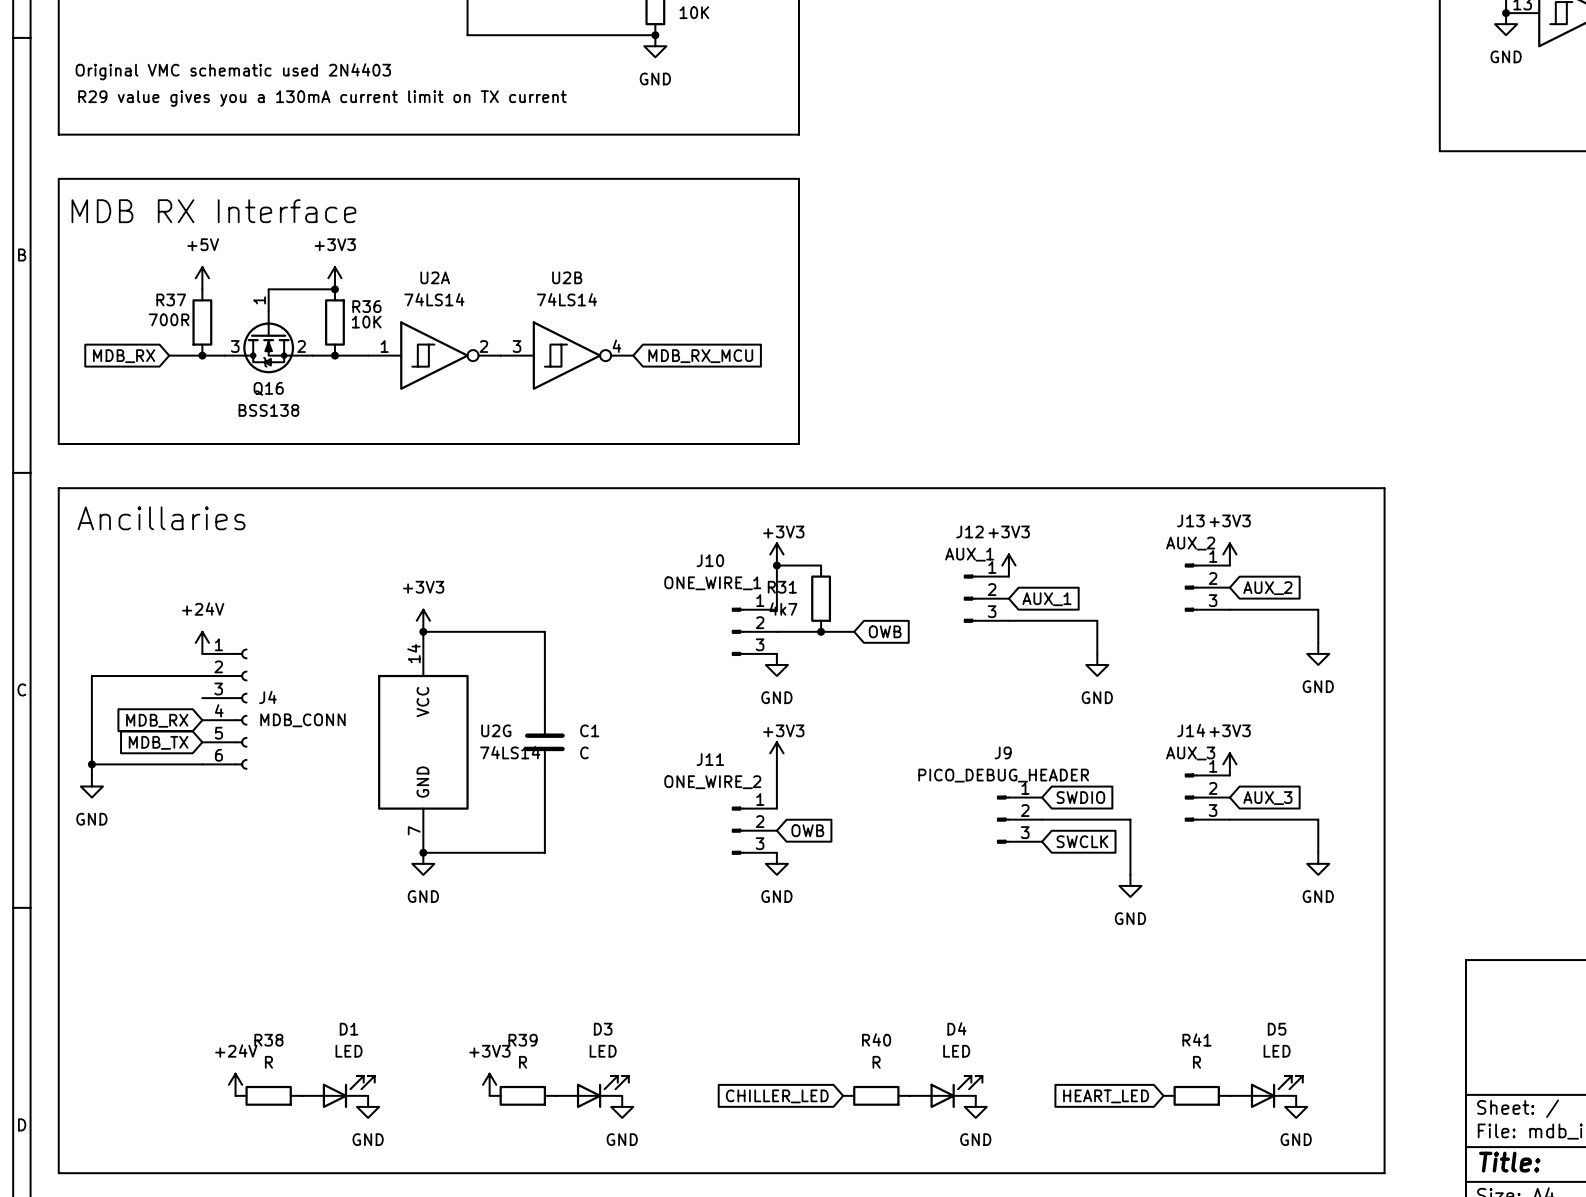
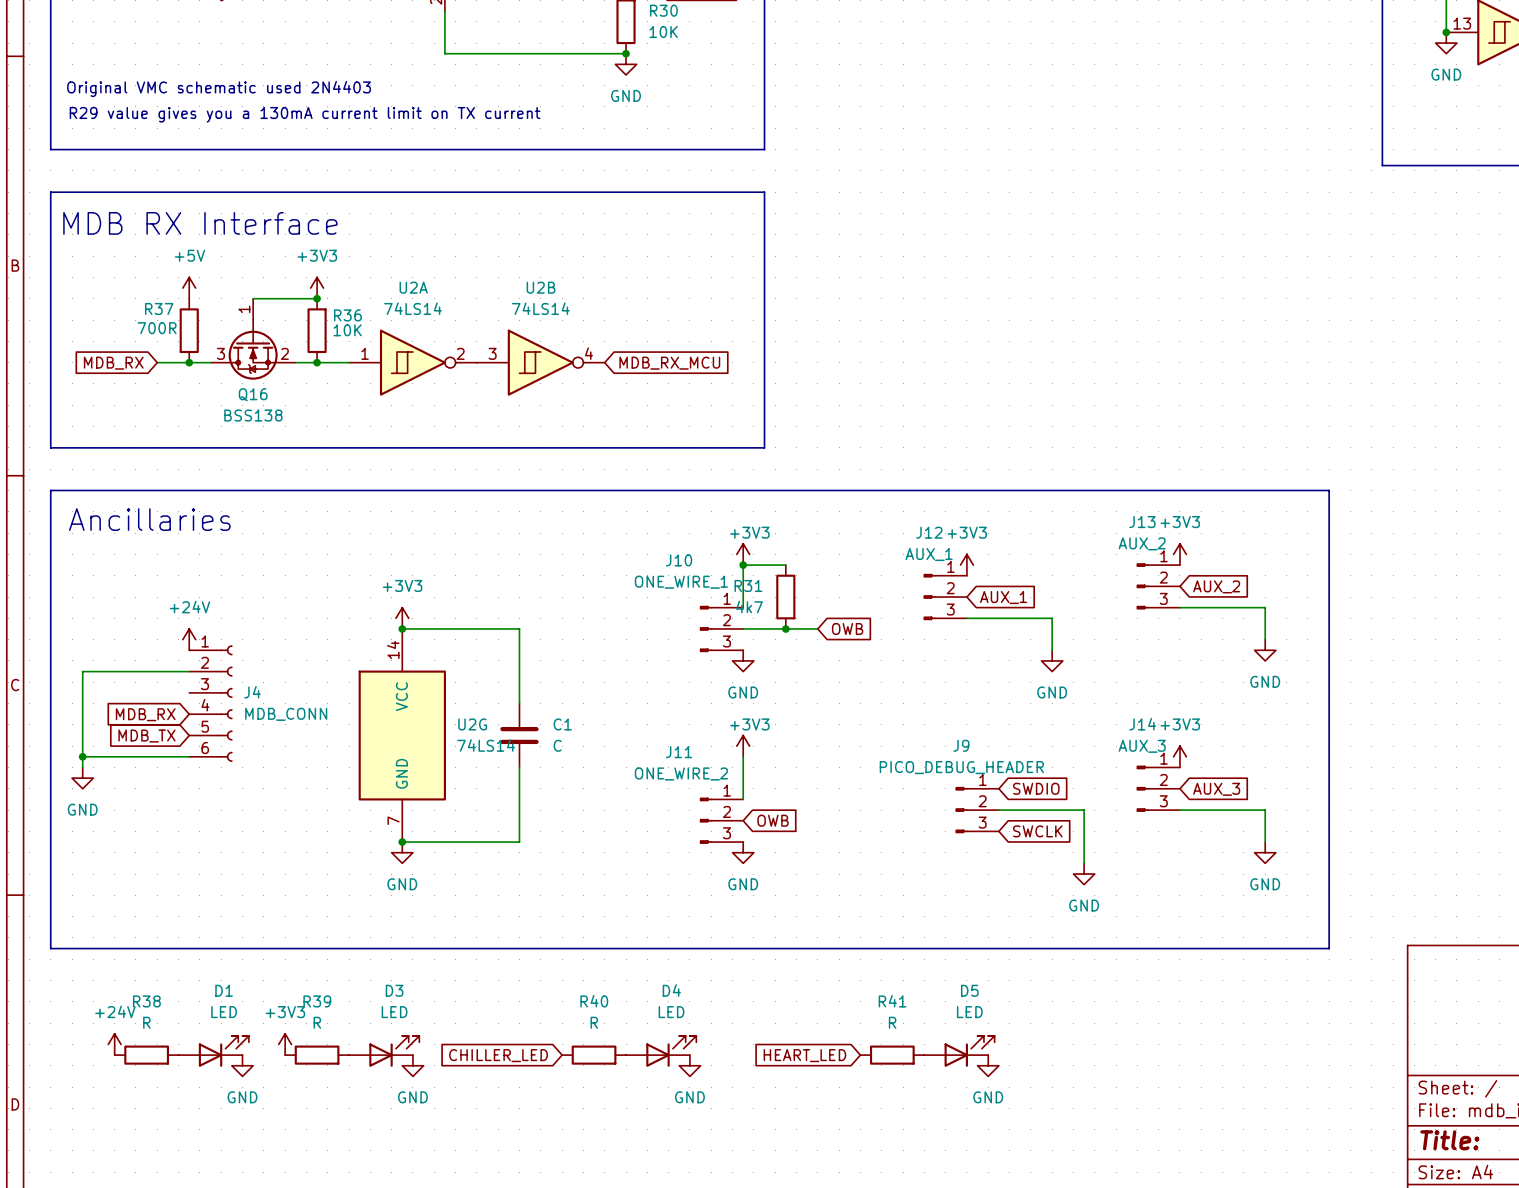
line: (58, 963) (58, 1173) (1384, 1173) (1384, 963) -> (50, 948) (1329, 948)
global label: none -> CHILLER_LED (498, 1055)
power symbol position: +24V (235, 1084) -> +24V (114, 1044)
power symbol: none -> GND (242, 1065)
power symbol: none -> GND (412, 1065)
power symbol position: +3V3 (489, 1084) -> +3V3 (285, 1044)
power symbol: none -> GND (689, 1065)
D1 position: (338, 1091) -> (213, 1051)
D3 position: (592, 1091) -> (384, 1051)
D4 position: (945, 1091) -> (661, 1051)
D5 position: (1266, 1091) -> (959, 1051)
R38 position: (268, 1095) -> (146, 1055)
R39 position: (522, 1095) -> (317, 1055)
R40 position: (876, 1095) -> (594, 1055)
R41 position: (1196, 1095) -> (892, 1055)
global label: CHILLER_LED (777, 1096) -> HEART_LED (804, 1055)
global label: HEART_LED (1106, 1096) -> none
power symbol: GND (368, 1106) -> none
power symbol: GND (622, 1106) -> none
power symbol position: GND (975, 1106) -> GND (988, 1065)
power symbol: GND (1296, 1106) -> none

